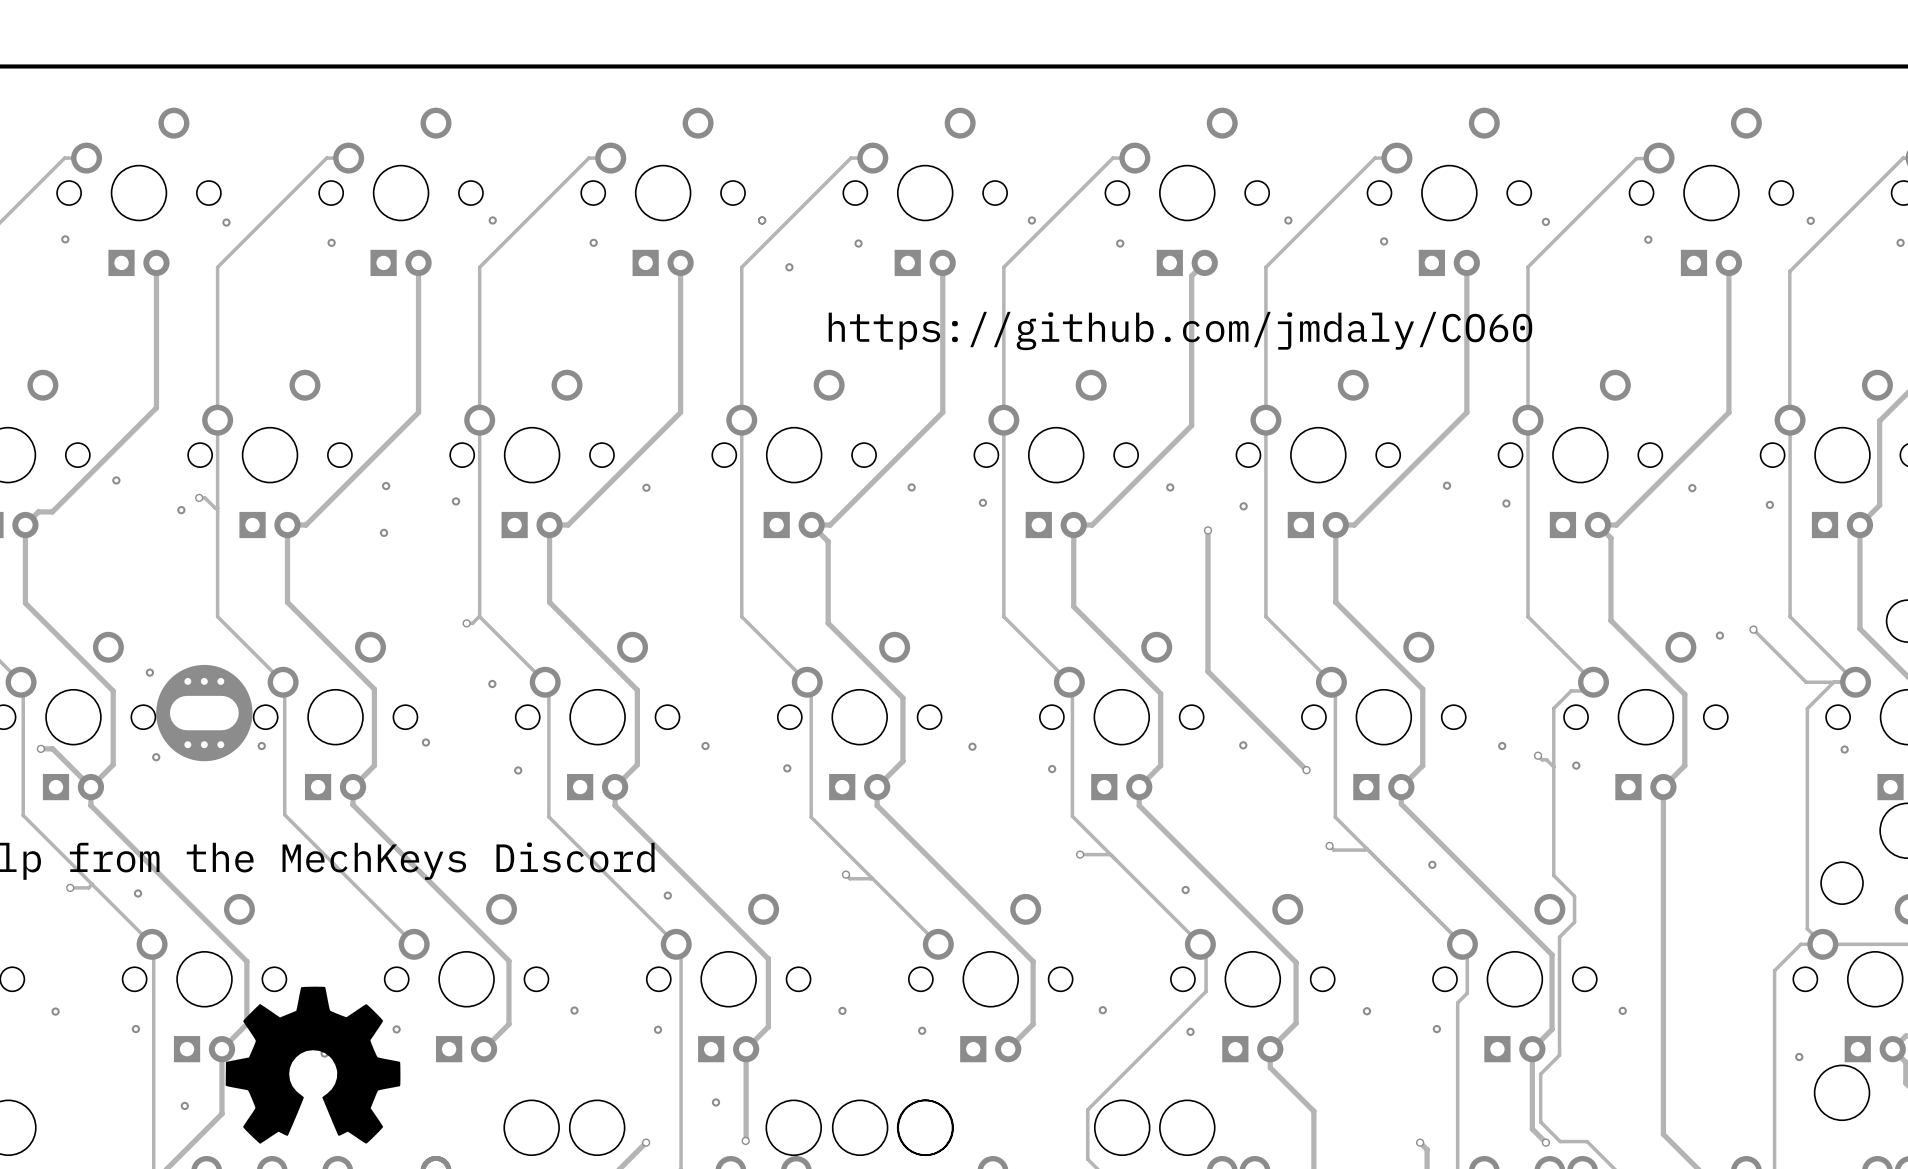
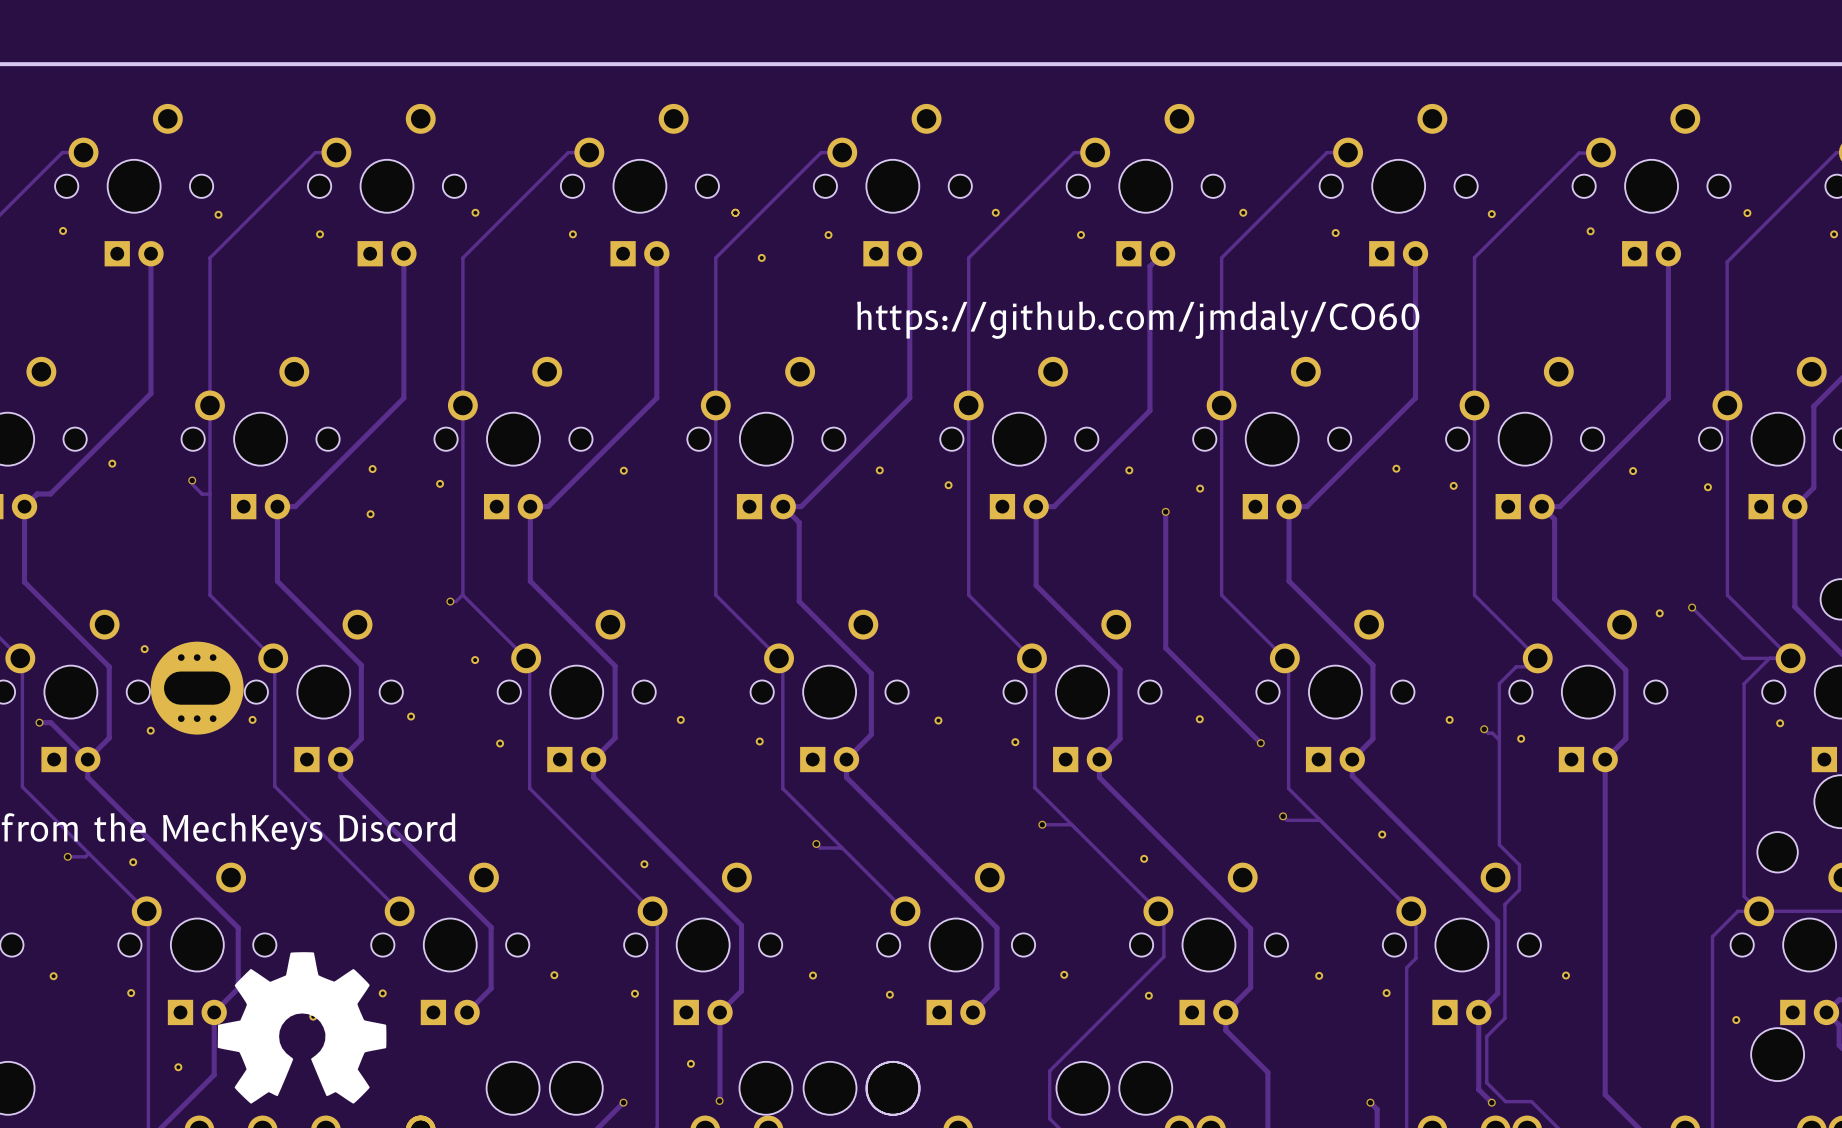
track: (199, 497) (205, 497) (217, 508) -> none
track: none -> (192, 484) (202, 494) (209, 494)
part: (181, 510) -> none

